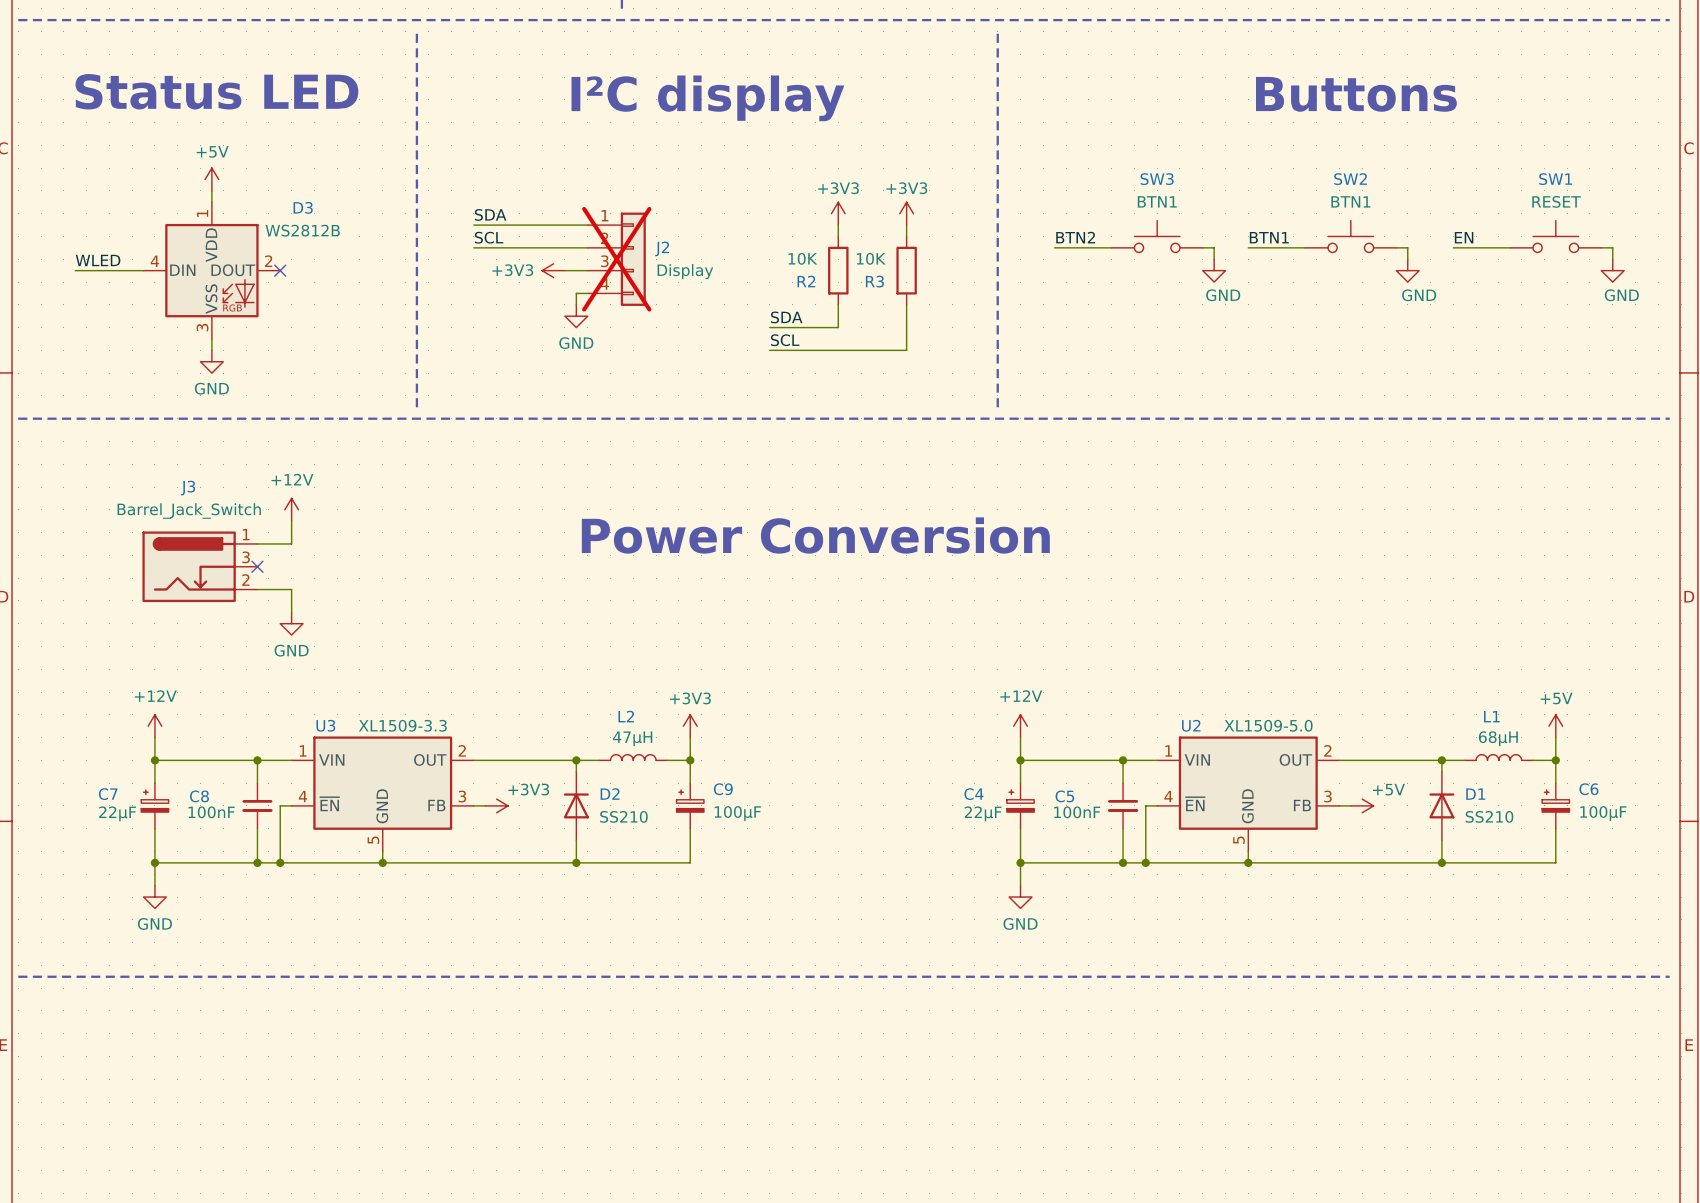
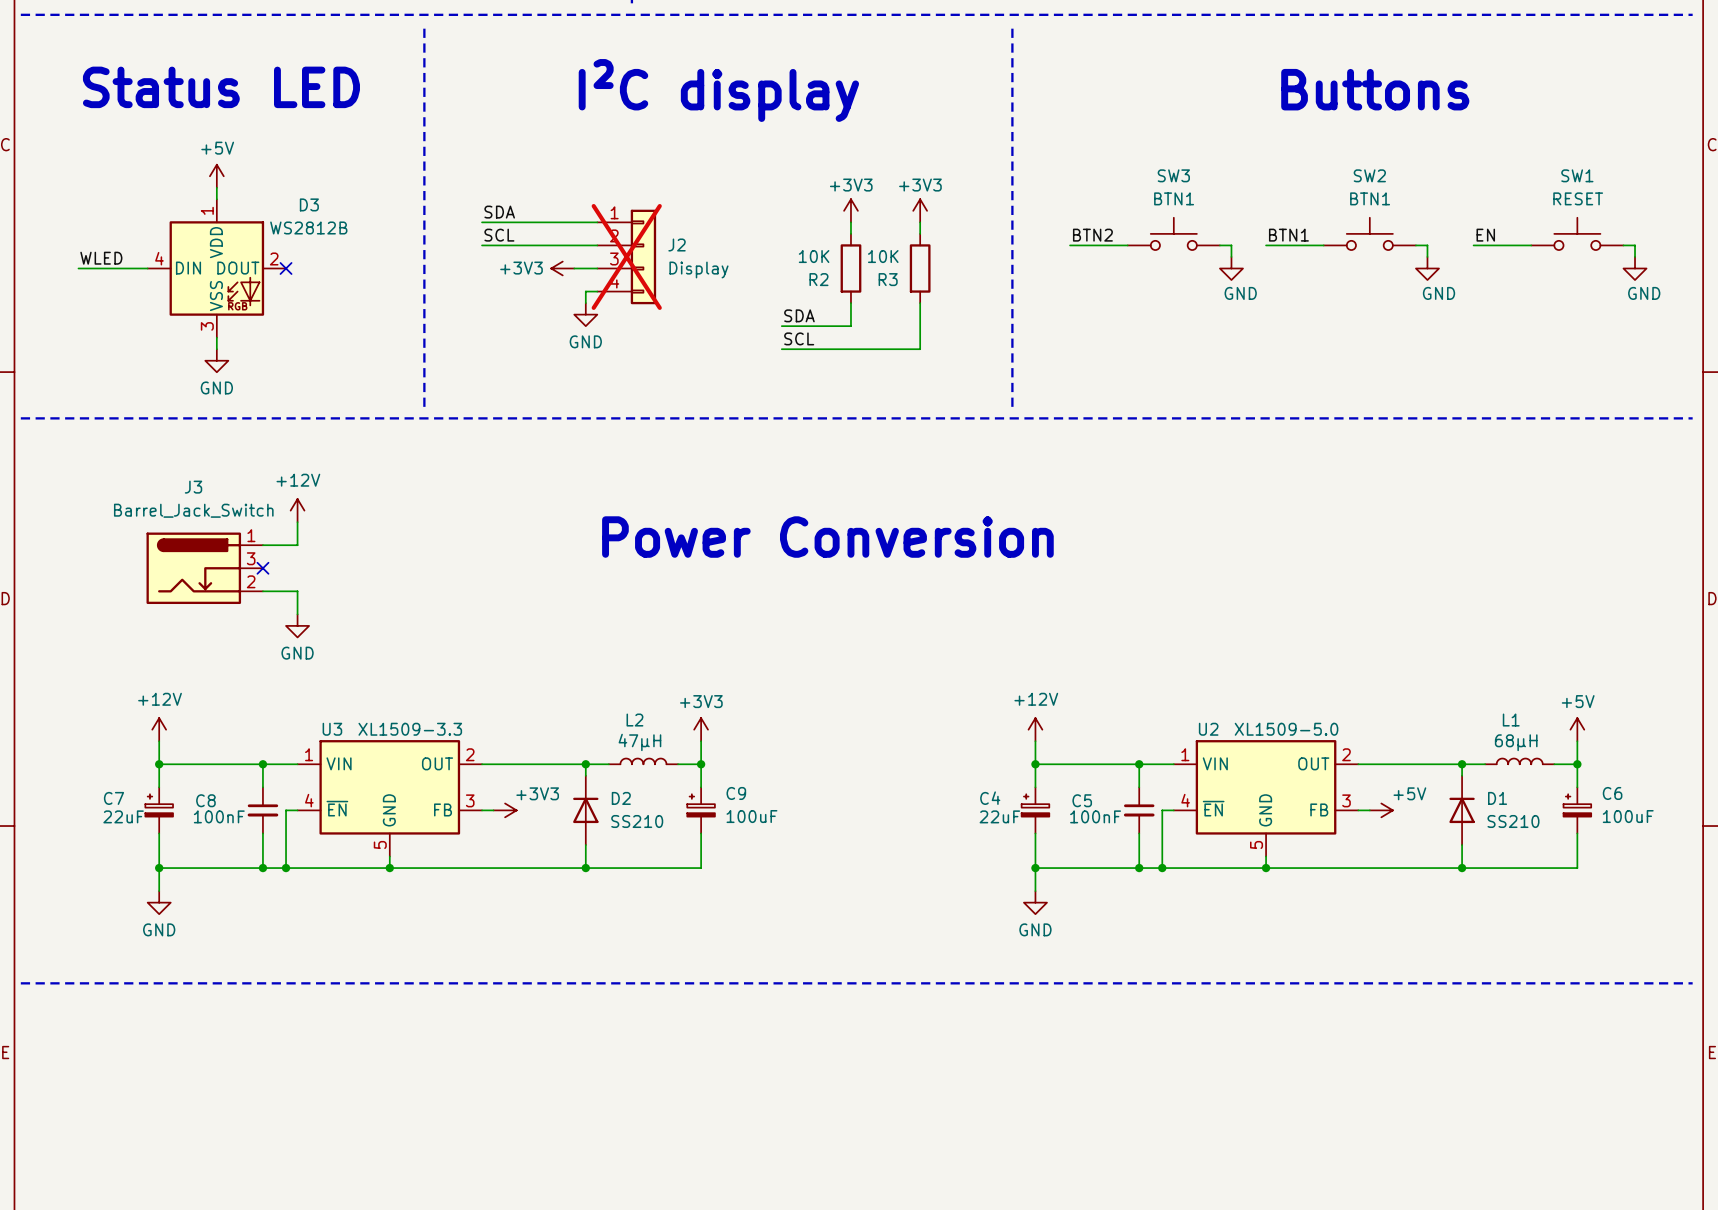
C7 value: 22µF (117, 813) -> 22uF (123, 816)
C9 value: 100µF (737, 813) -> 100uF (751, 816)
C4 value: 22µF (983, 813) -> 22uF (999, 816)
C6 value: 100µF (1603, 813) -> 100uF (1628, 816)

